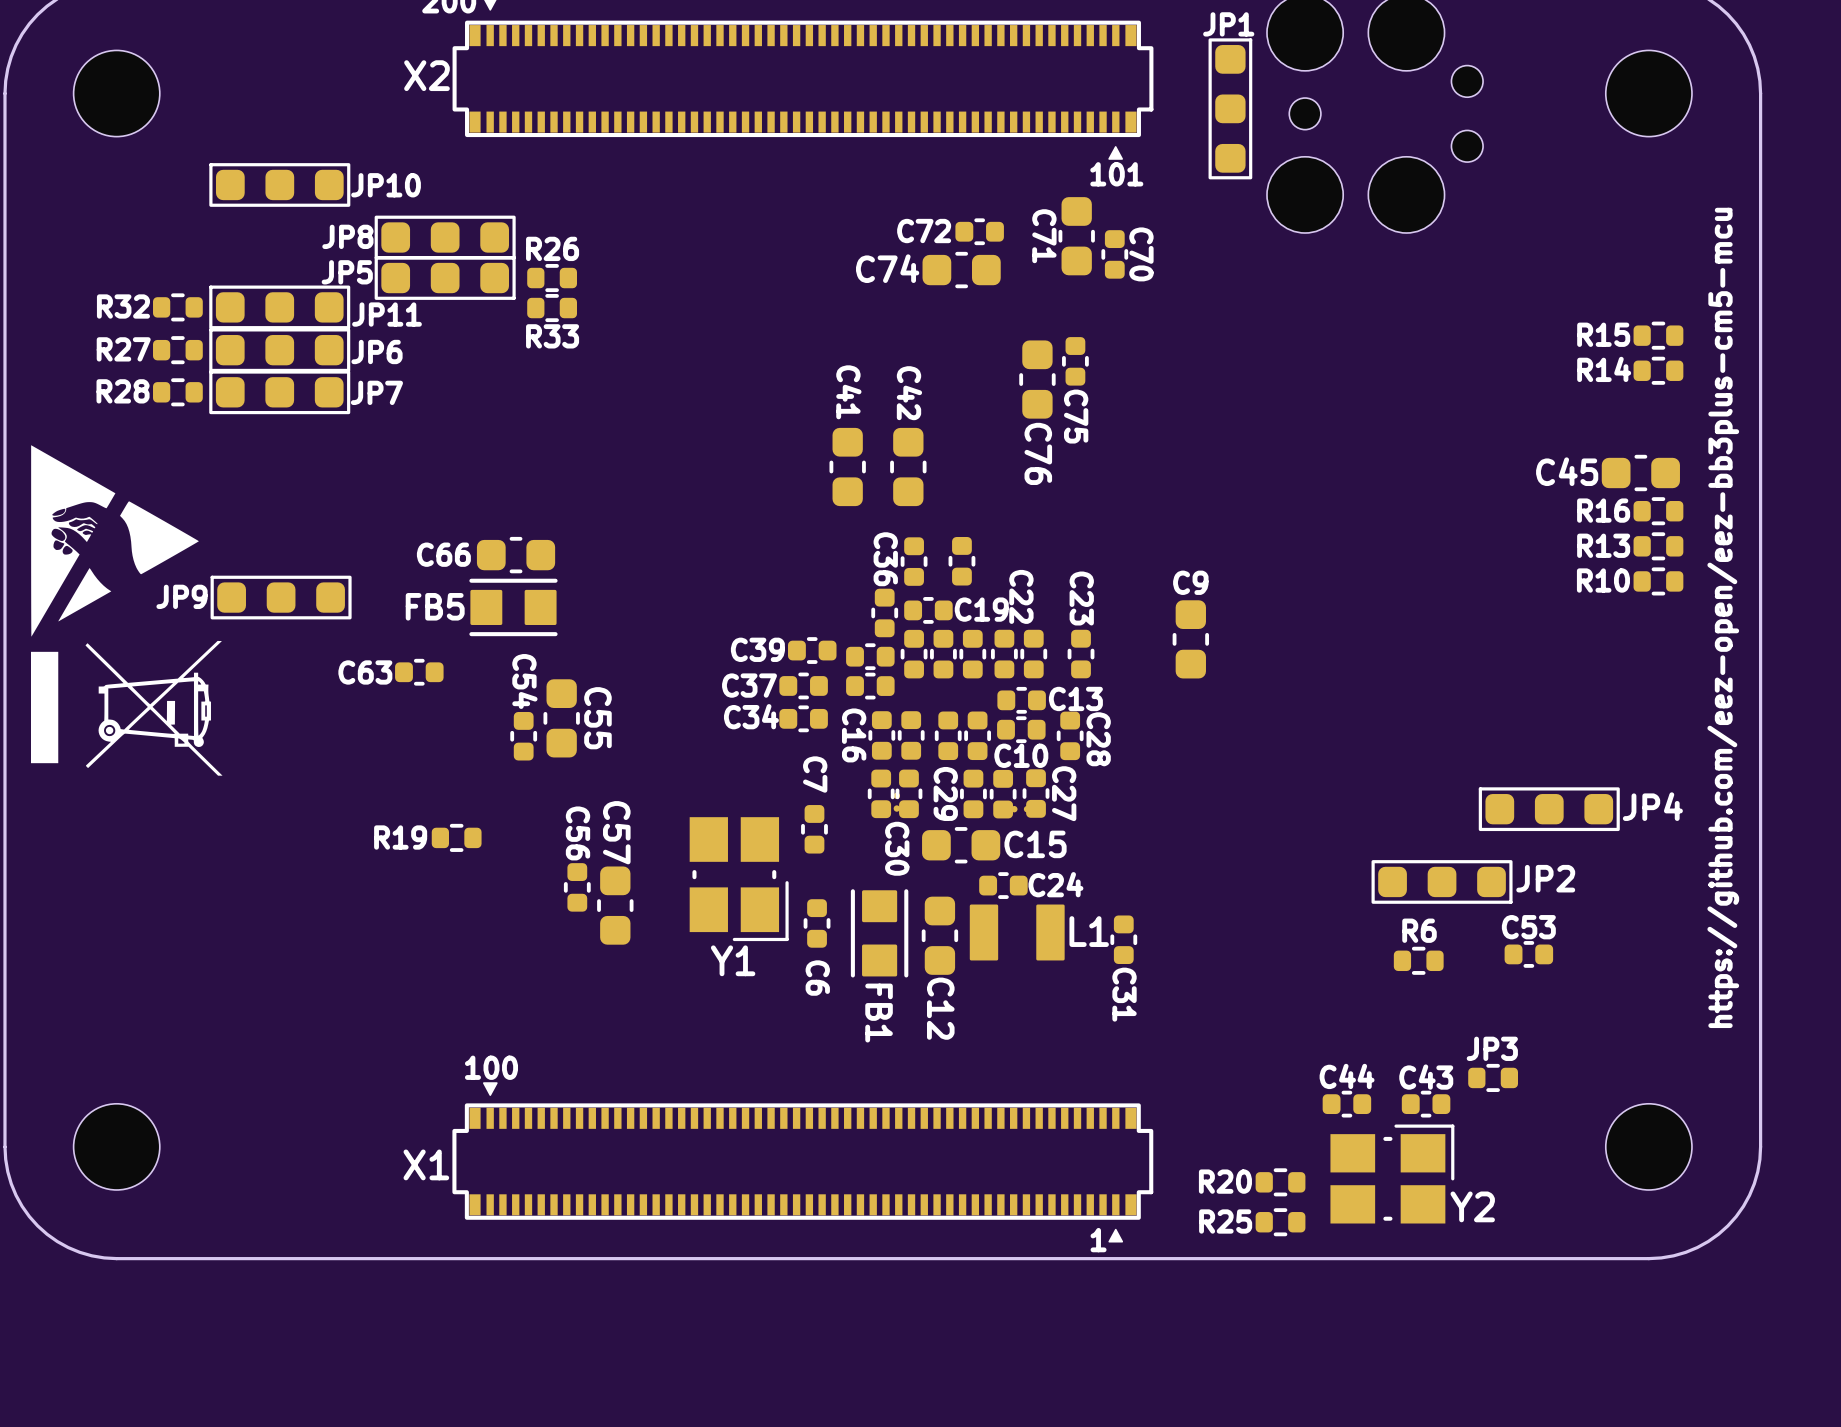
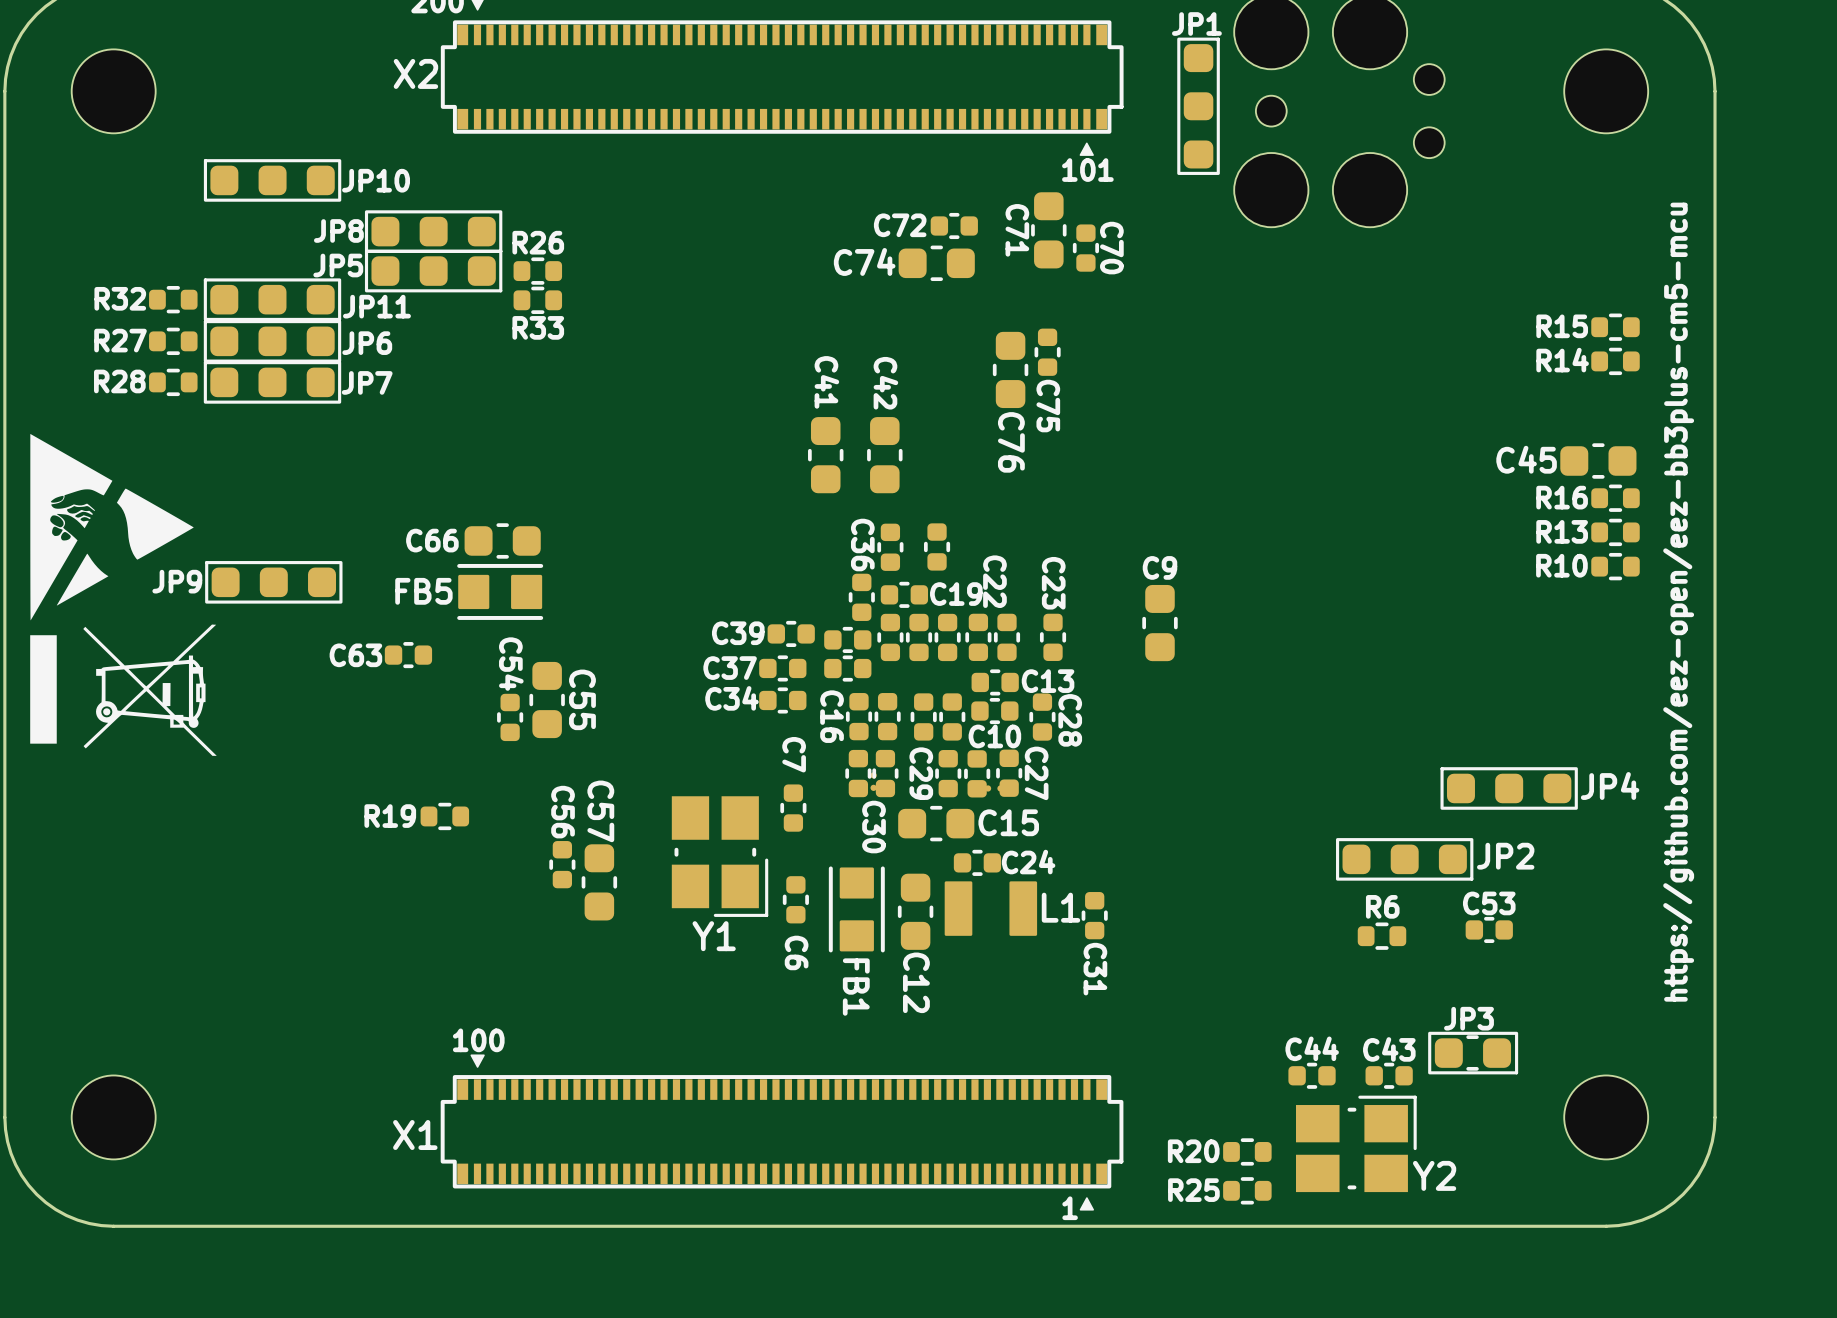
JP3 footprint: [1468, 1063, 1519, 1092] -> [1428, 1031, 1519, 1075]

